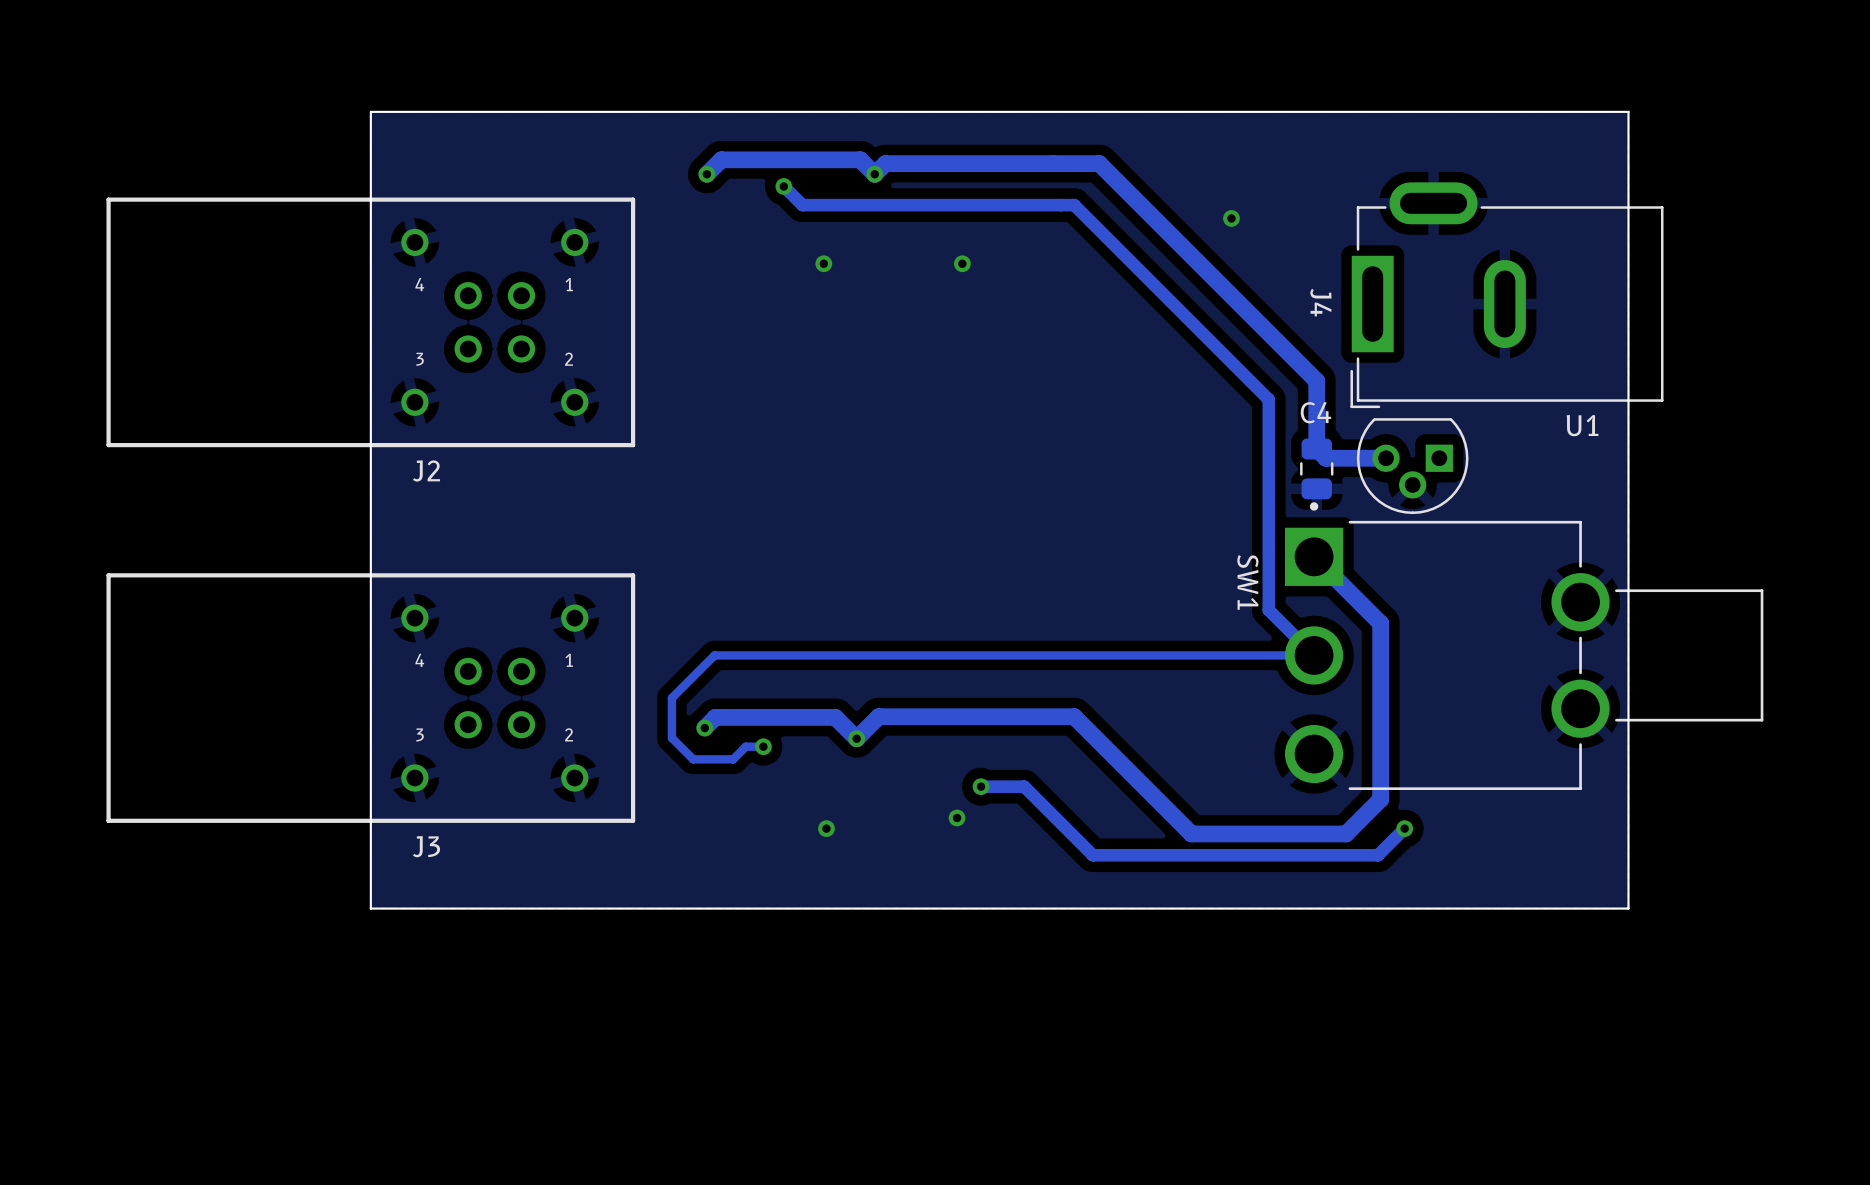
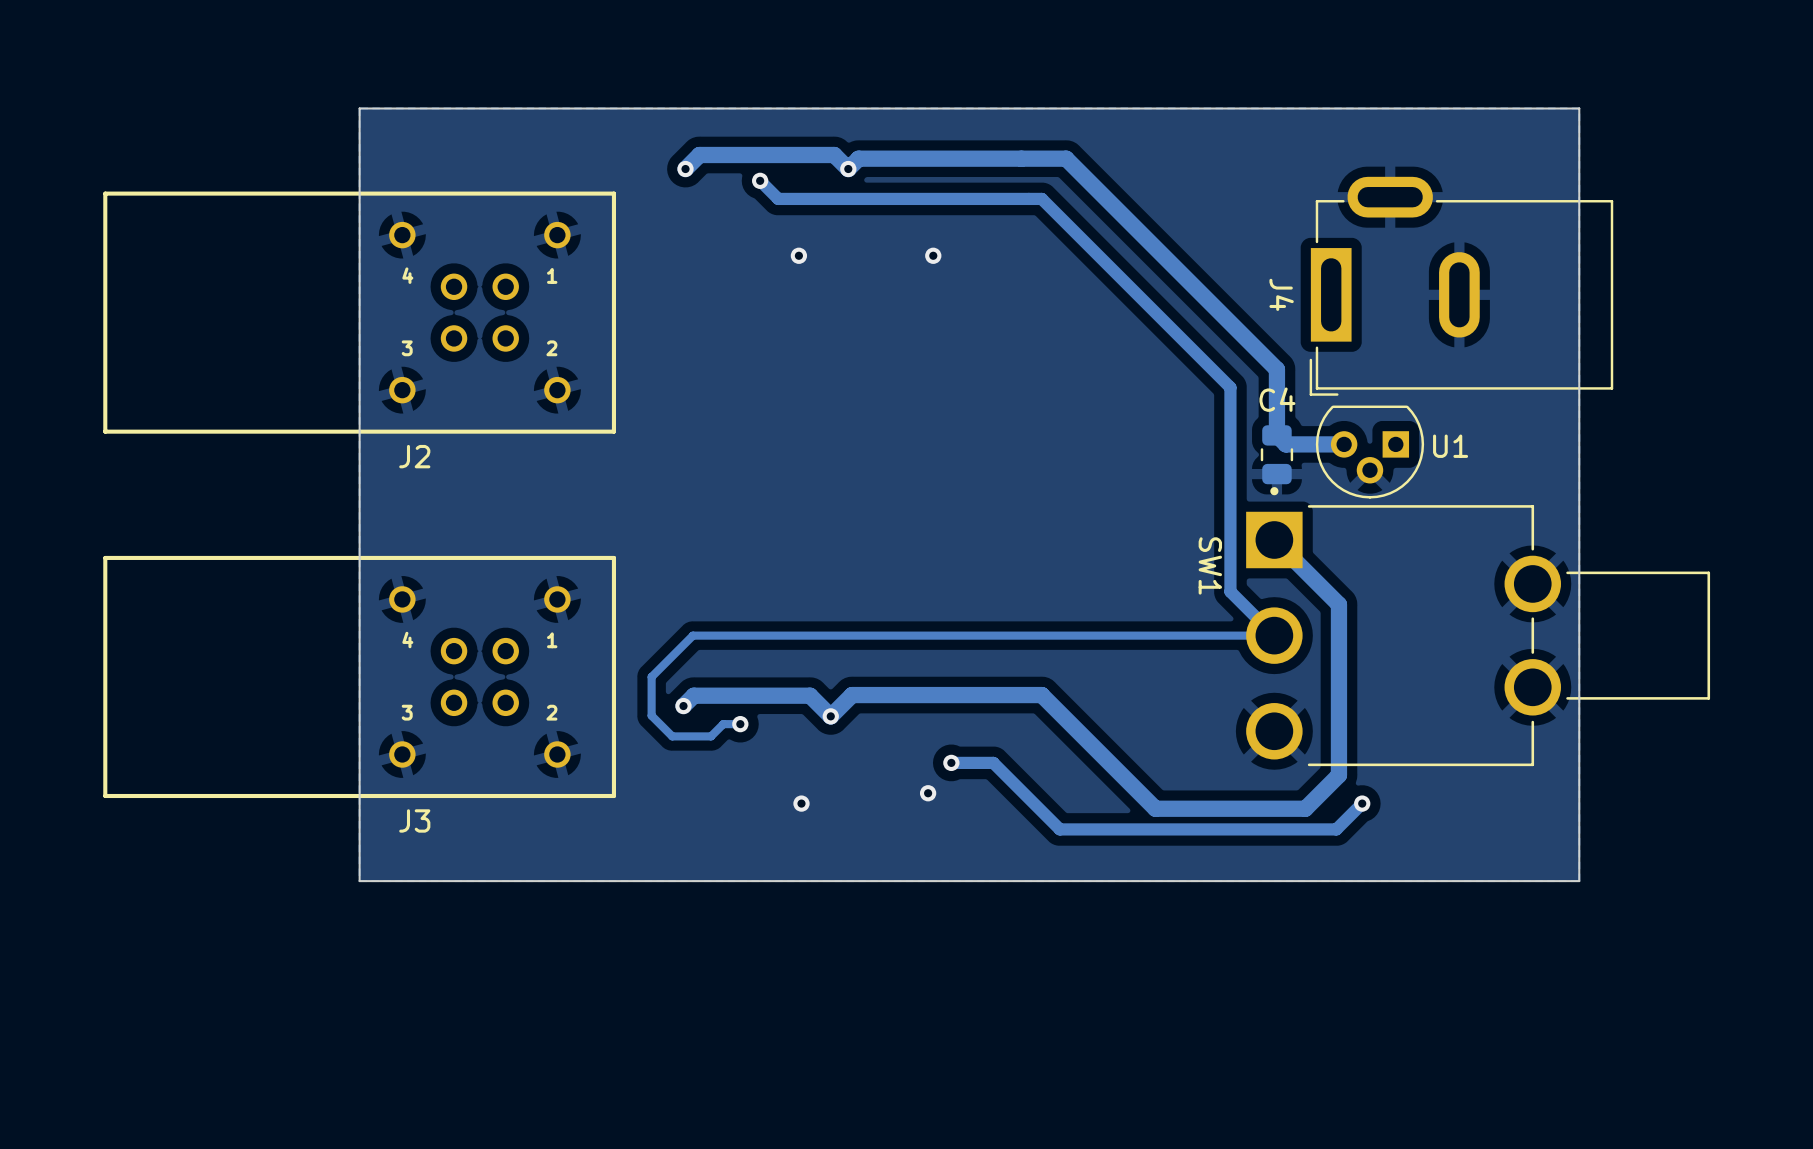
via: (1231, 218) -> none
U1 name position: U1 (1582, 425) -> U1 (1450, 446)

